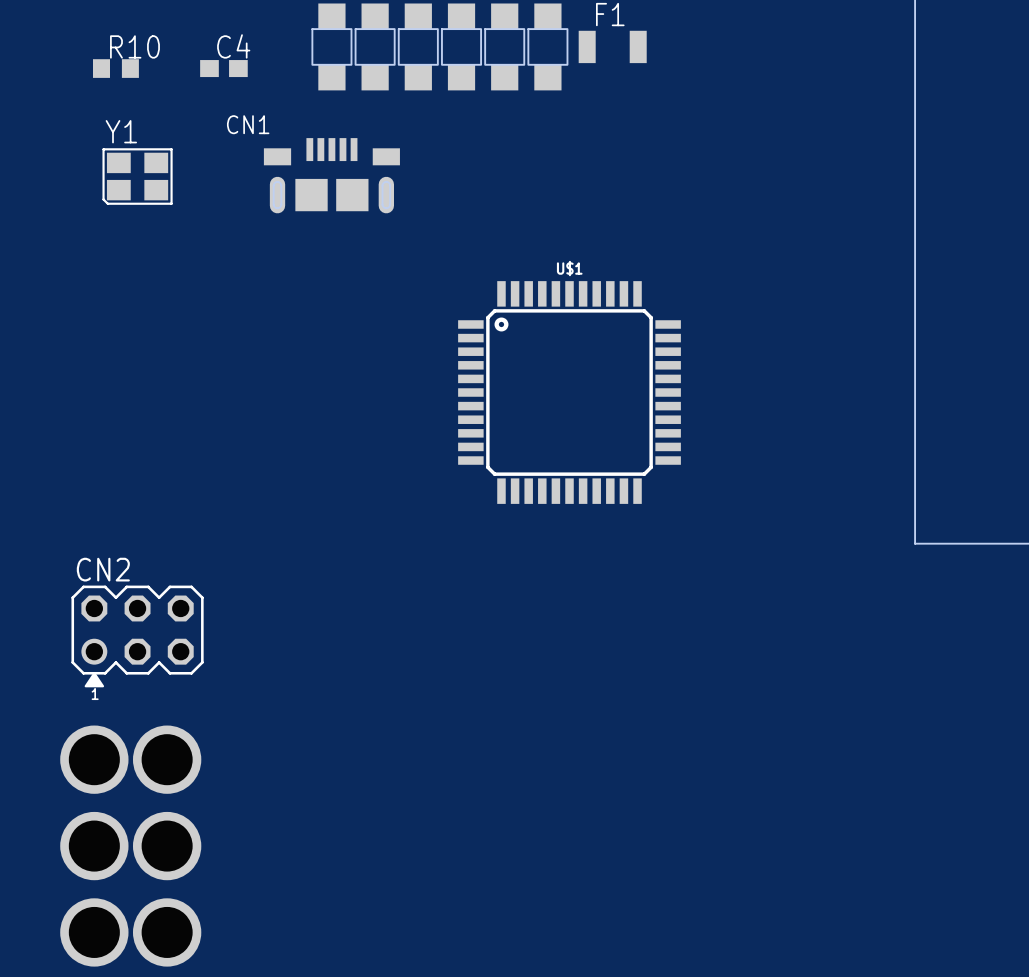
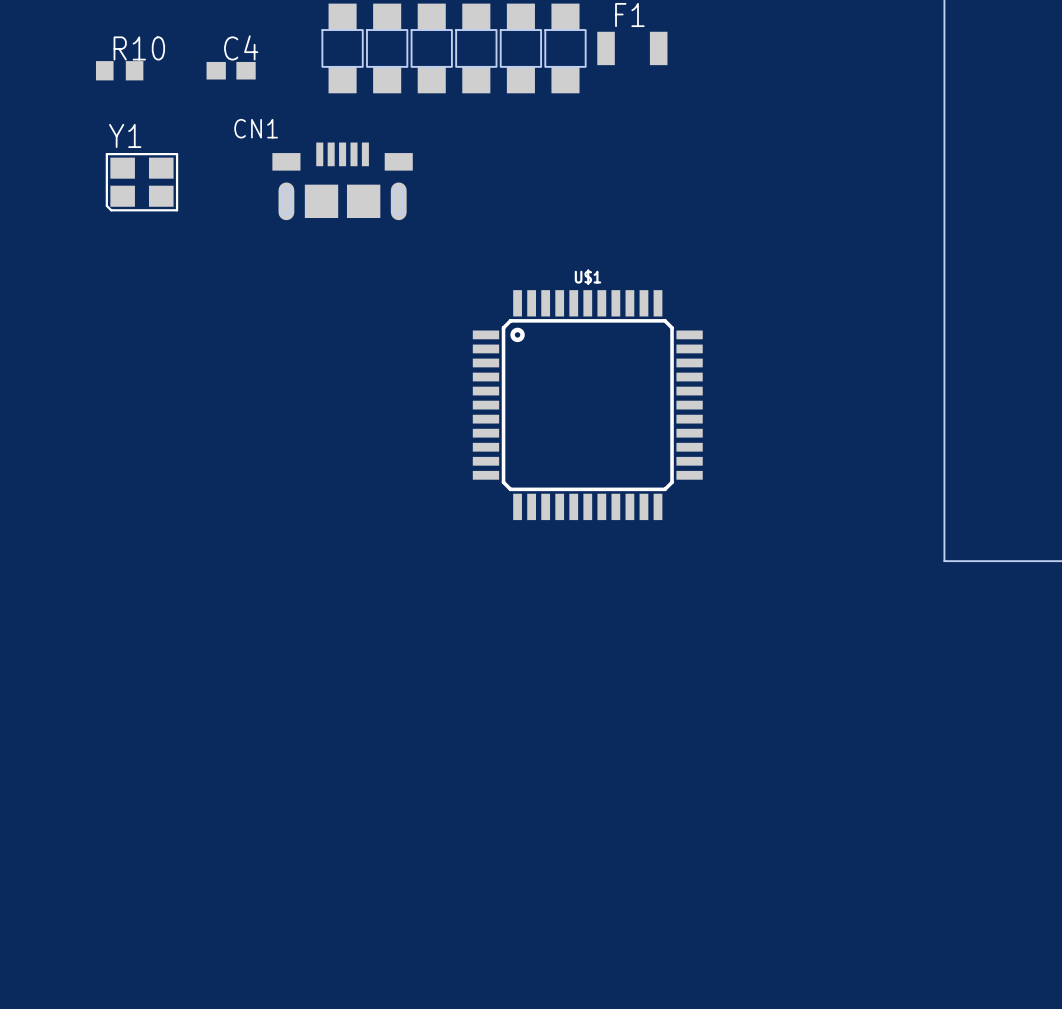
CN2: (137, 636) -> none
part: (130, 759) -> none
part: (130, 846) -> none
part: (130, 932) -> none

